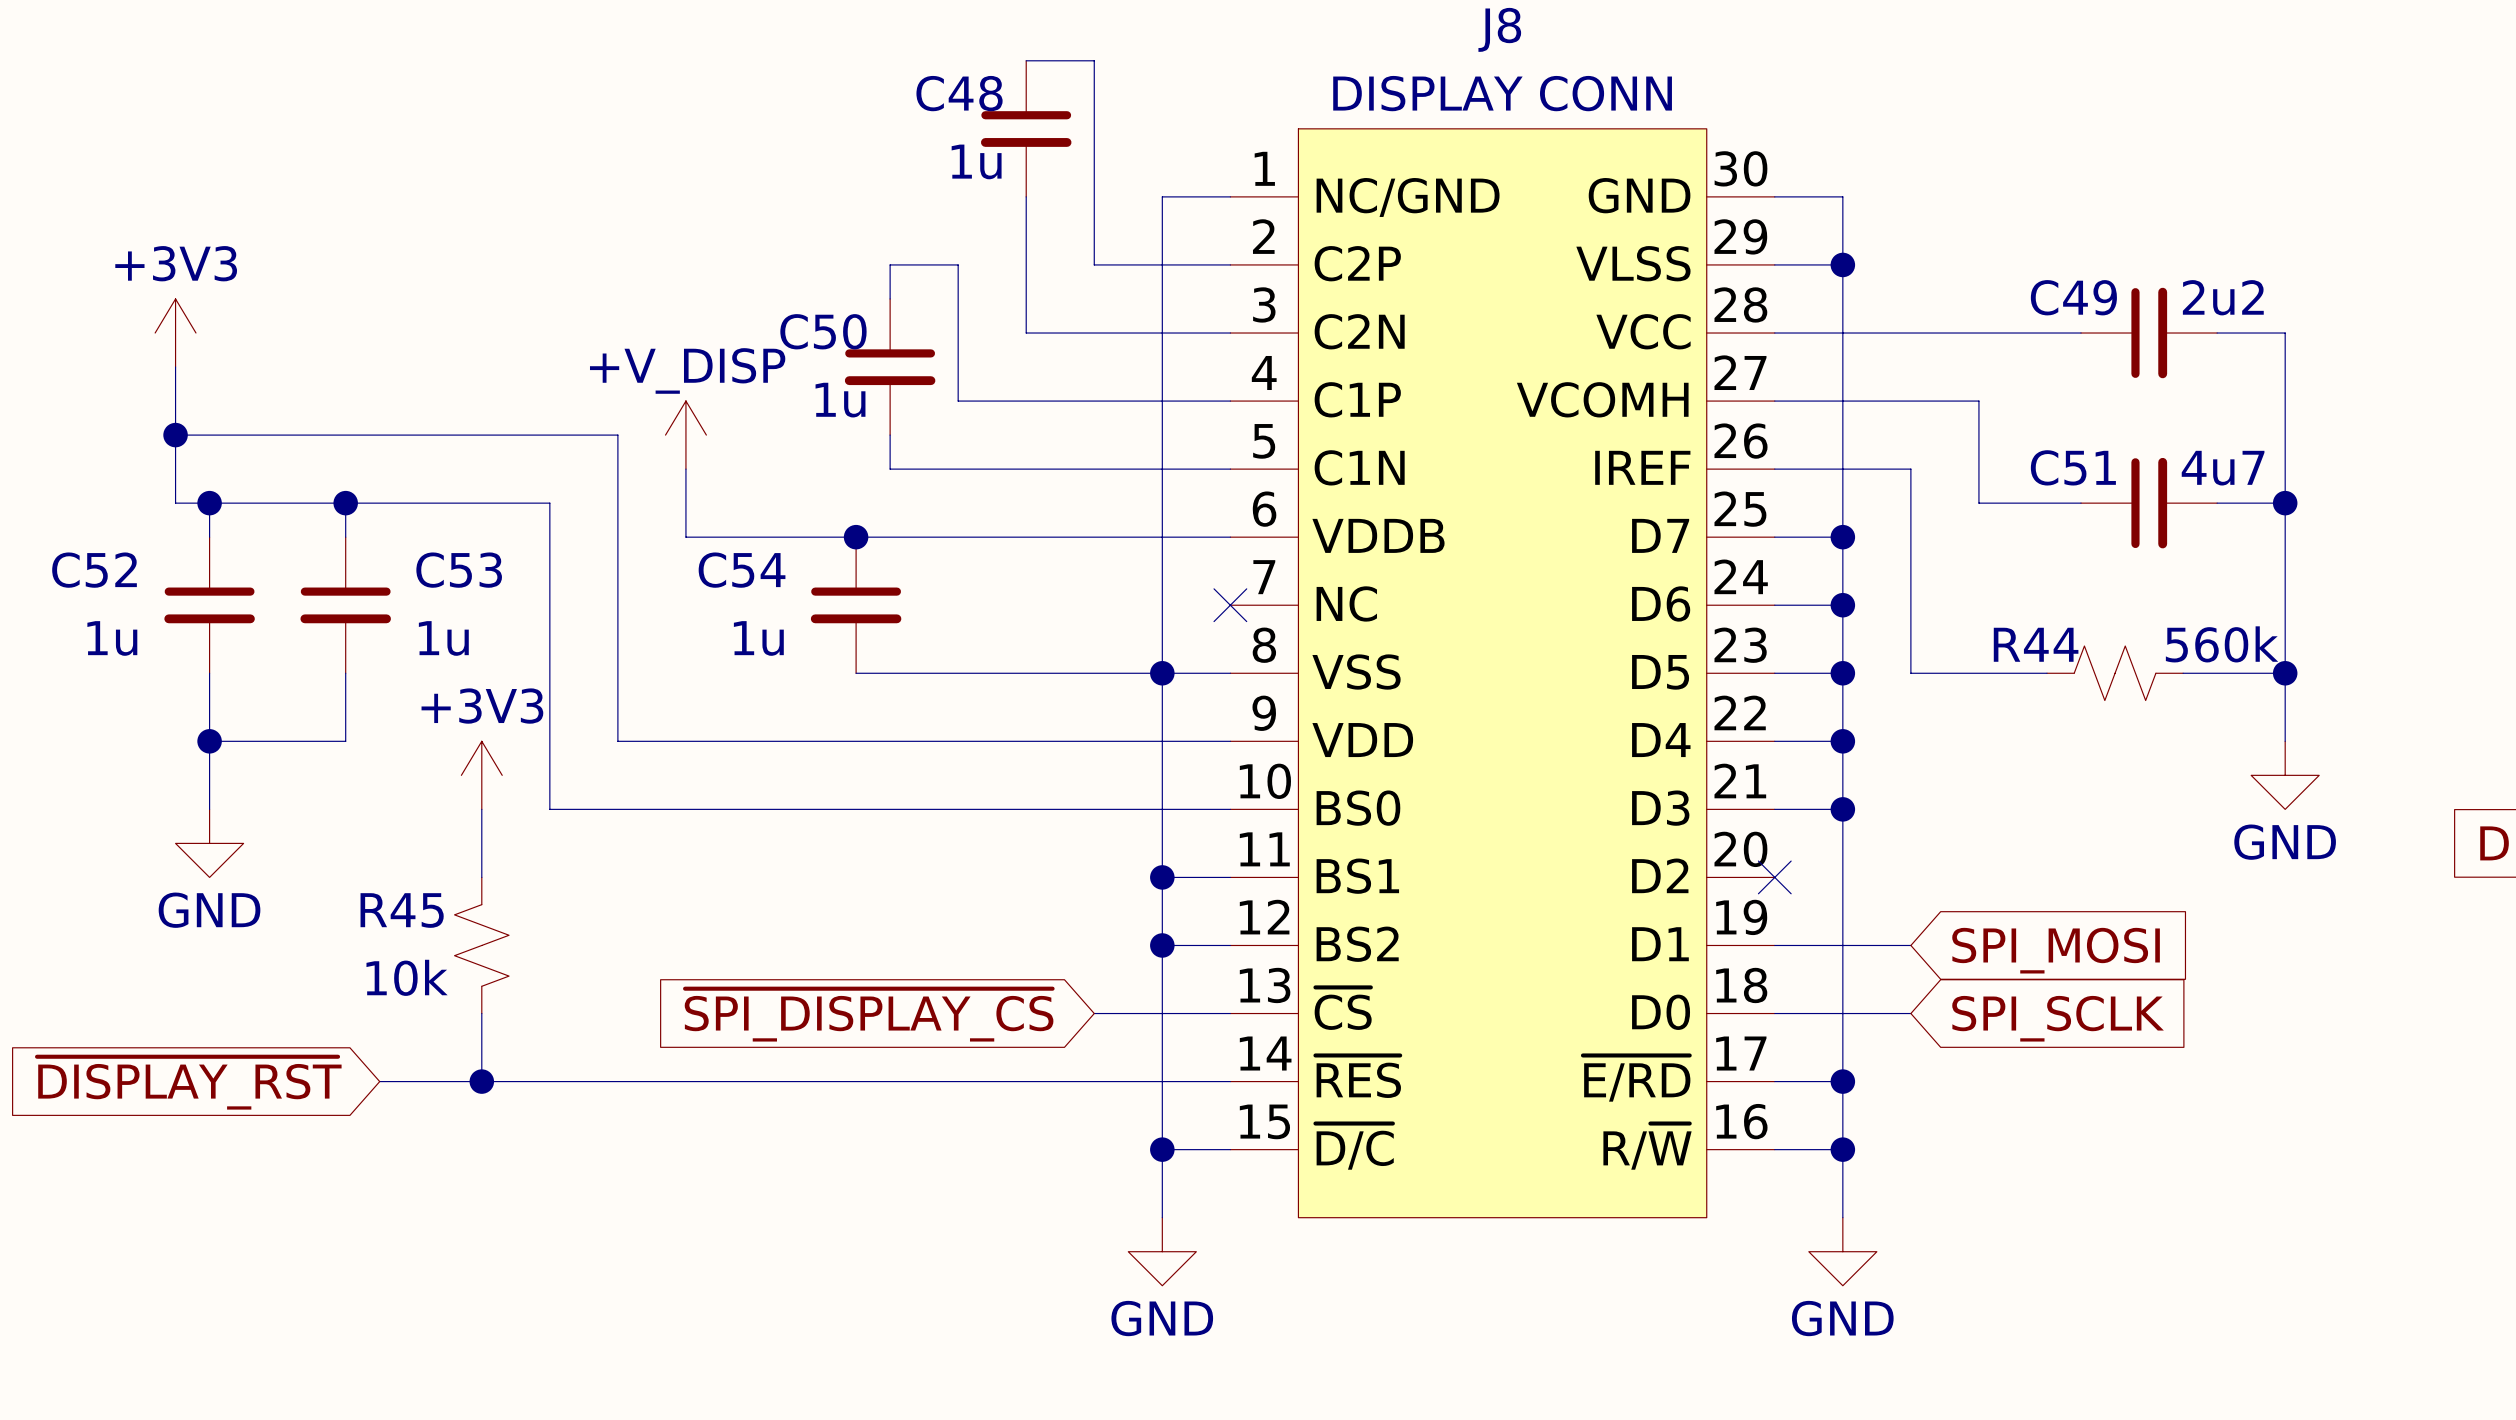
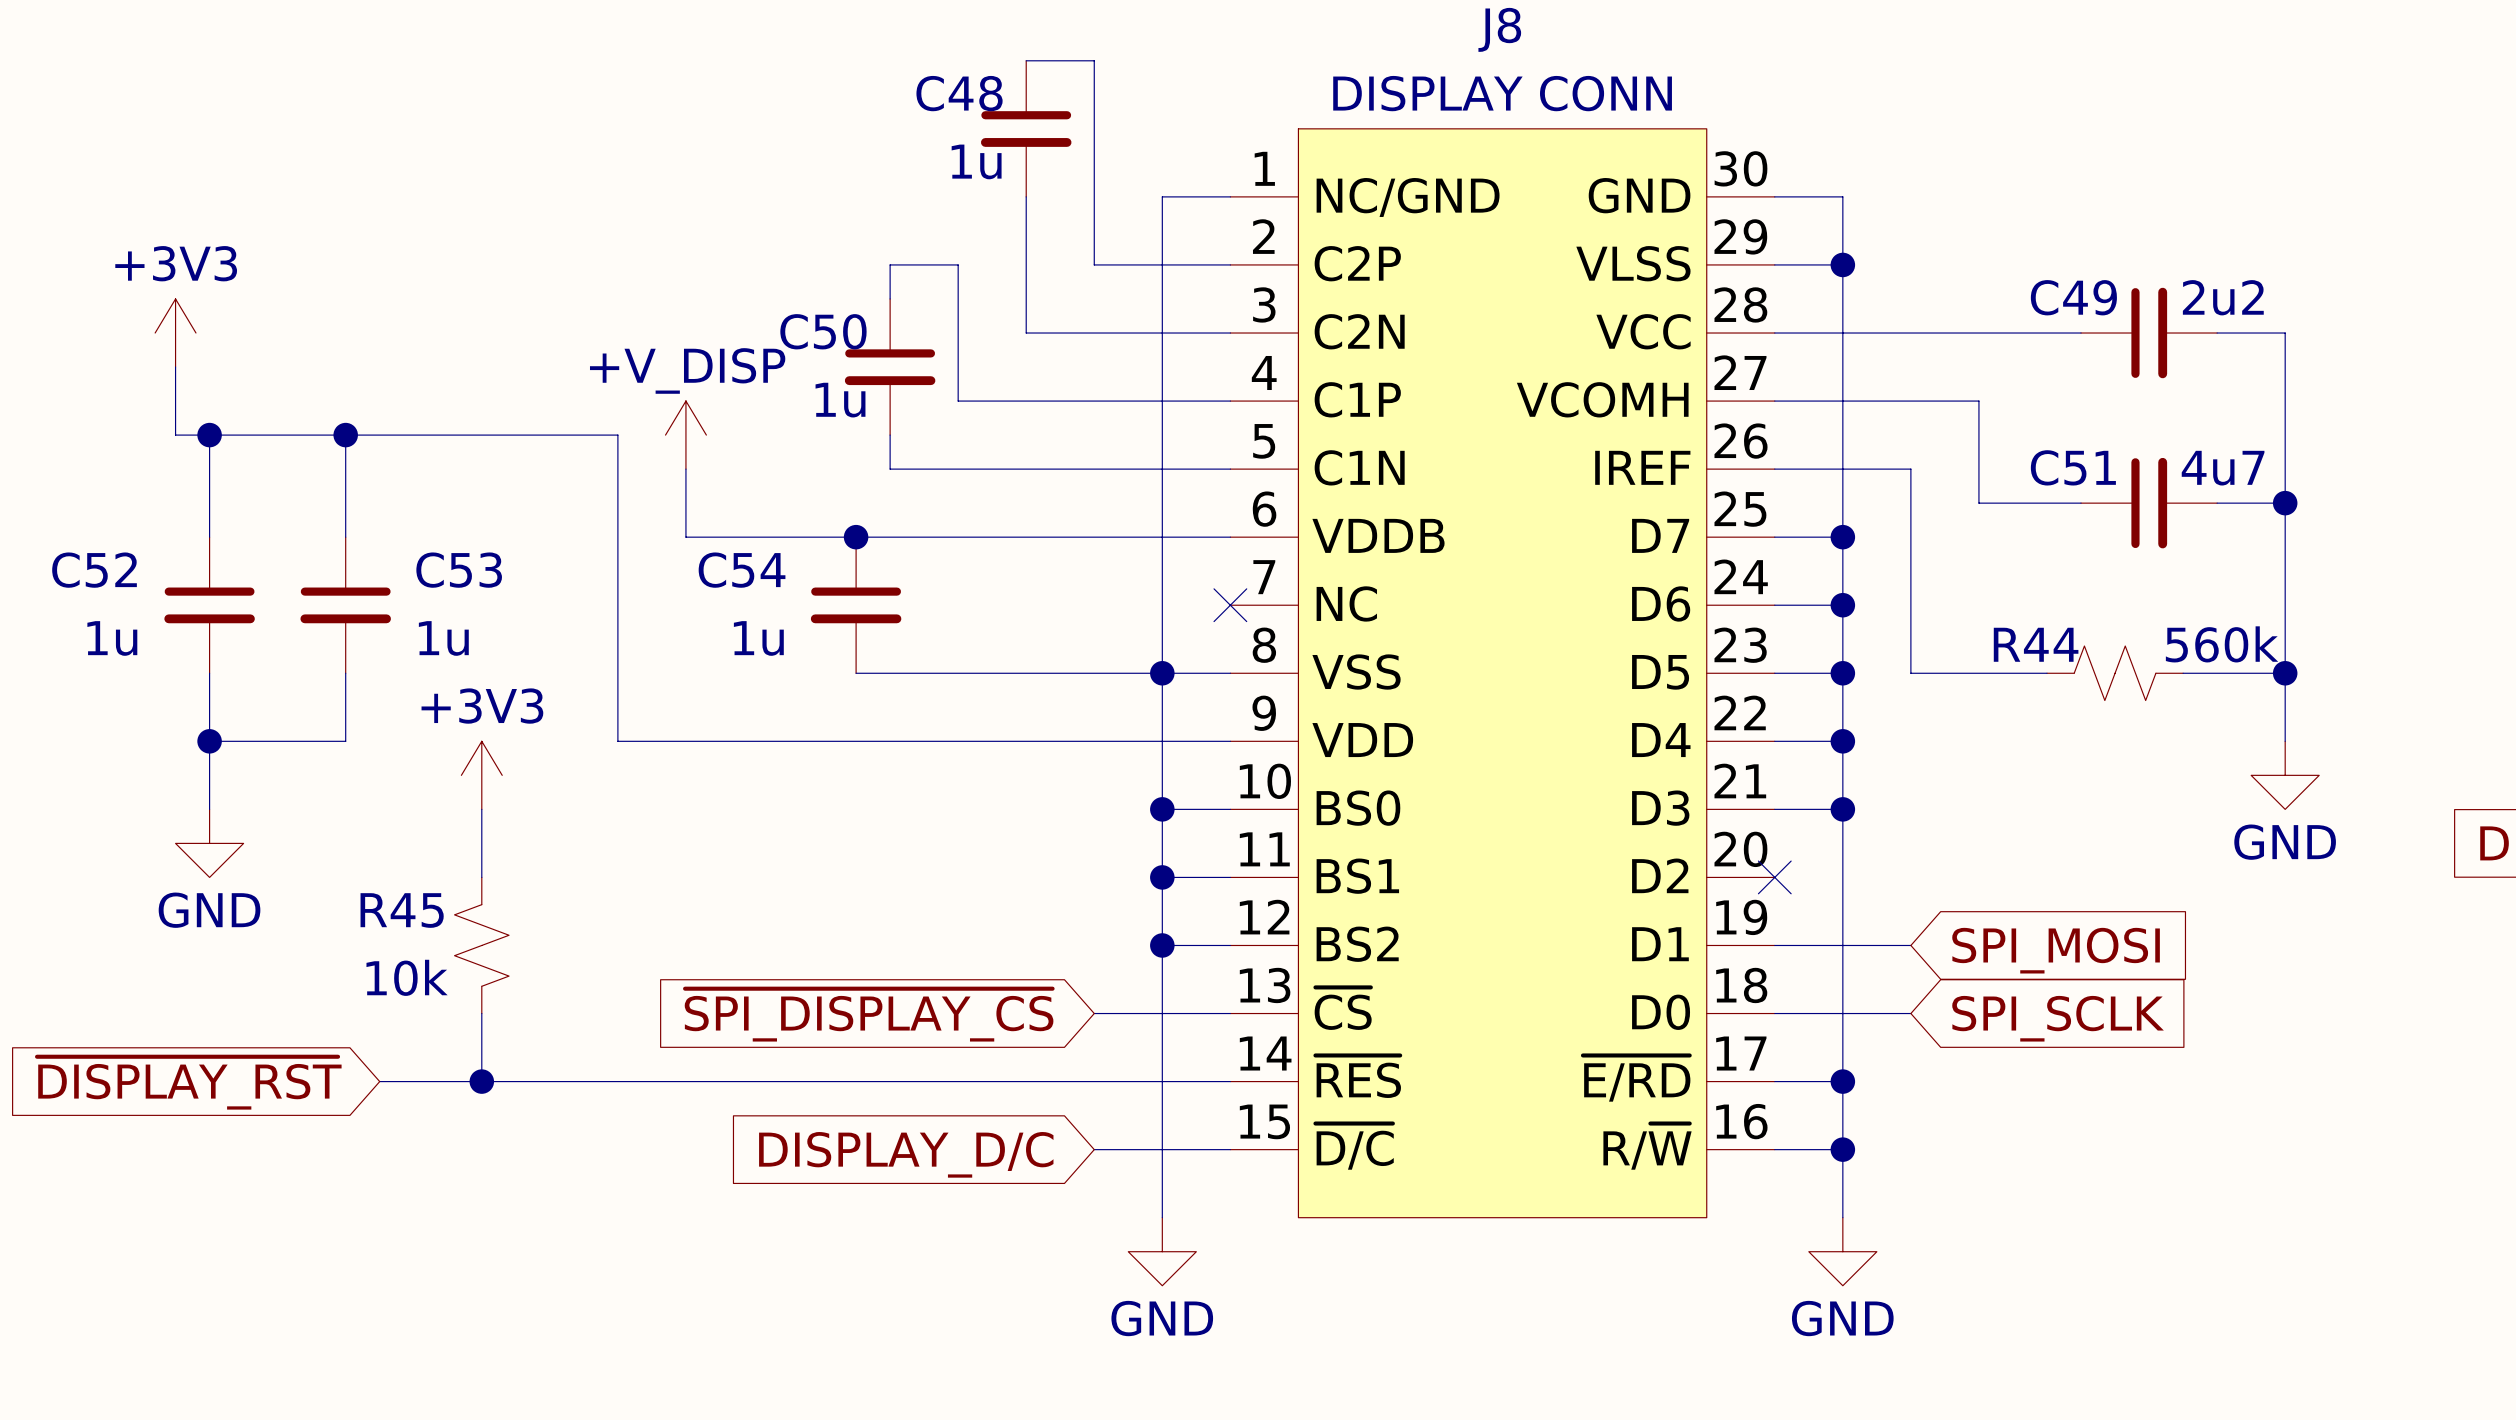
wire: (175, 435) (175, 503) (549, 503) (549, 809) (1162, 809) -> none
junction: (175, 435) -> none
wire: none -> (209, 435) (209, 503)
junction: none -> (209, 435)
wire: none -> (345, 435) (345, 503)
junction: (209, 503) -> none
junction position: (345, 503) -> (345, 435)
junction: none -> (1162, 809)
wire: none -> (1094, 1149) (1162, 1149)
junction: (1162, 1149) -> none
global label: none -> DISPLAY_D/C (906, 1154)

